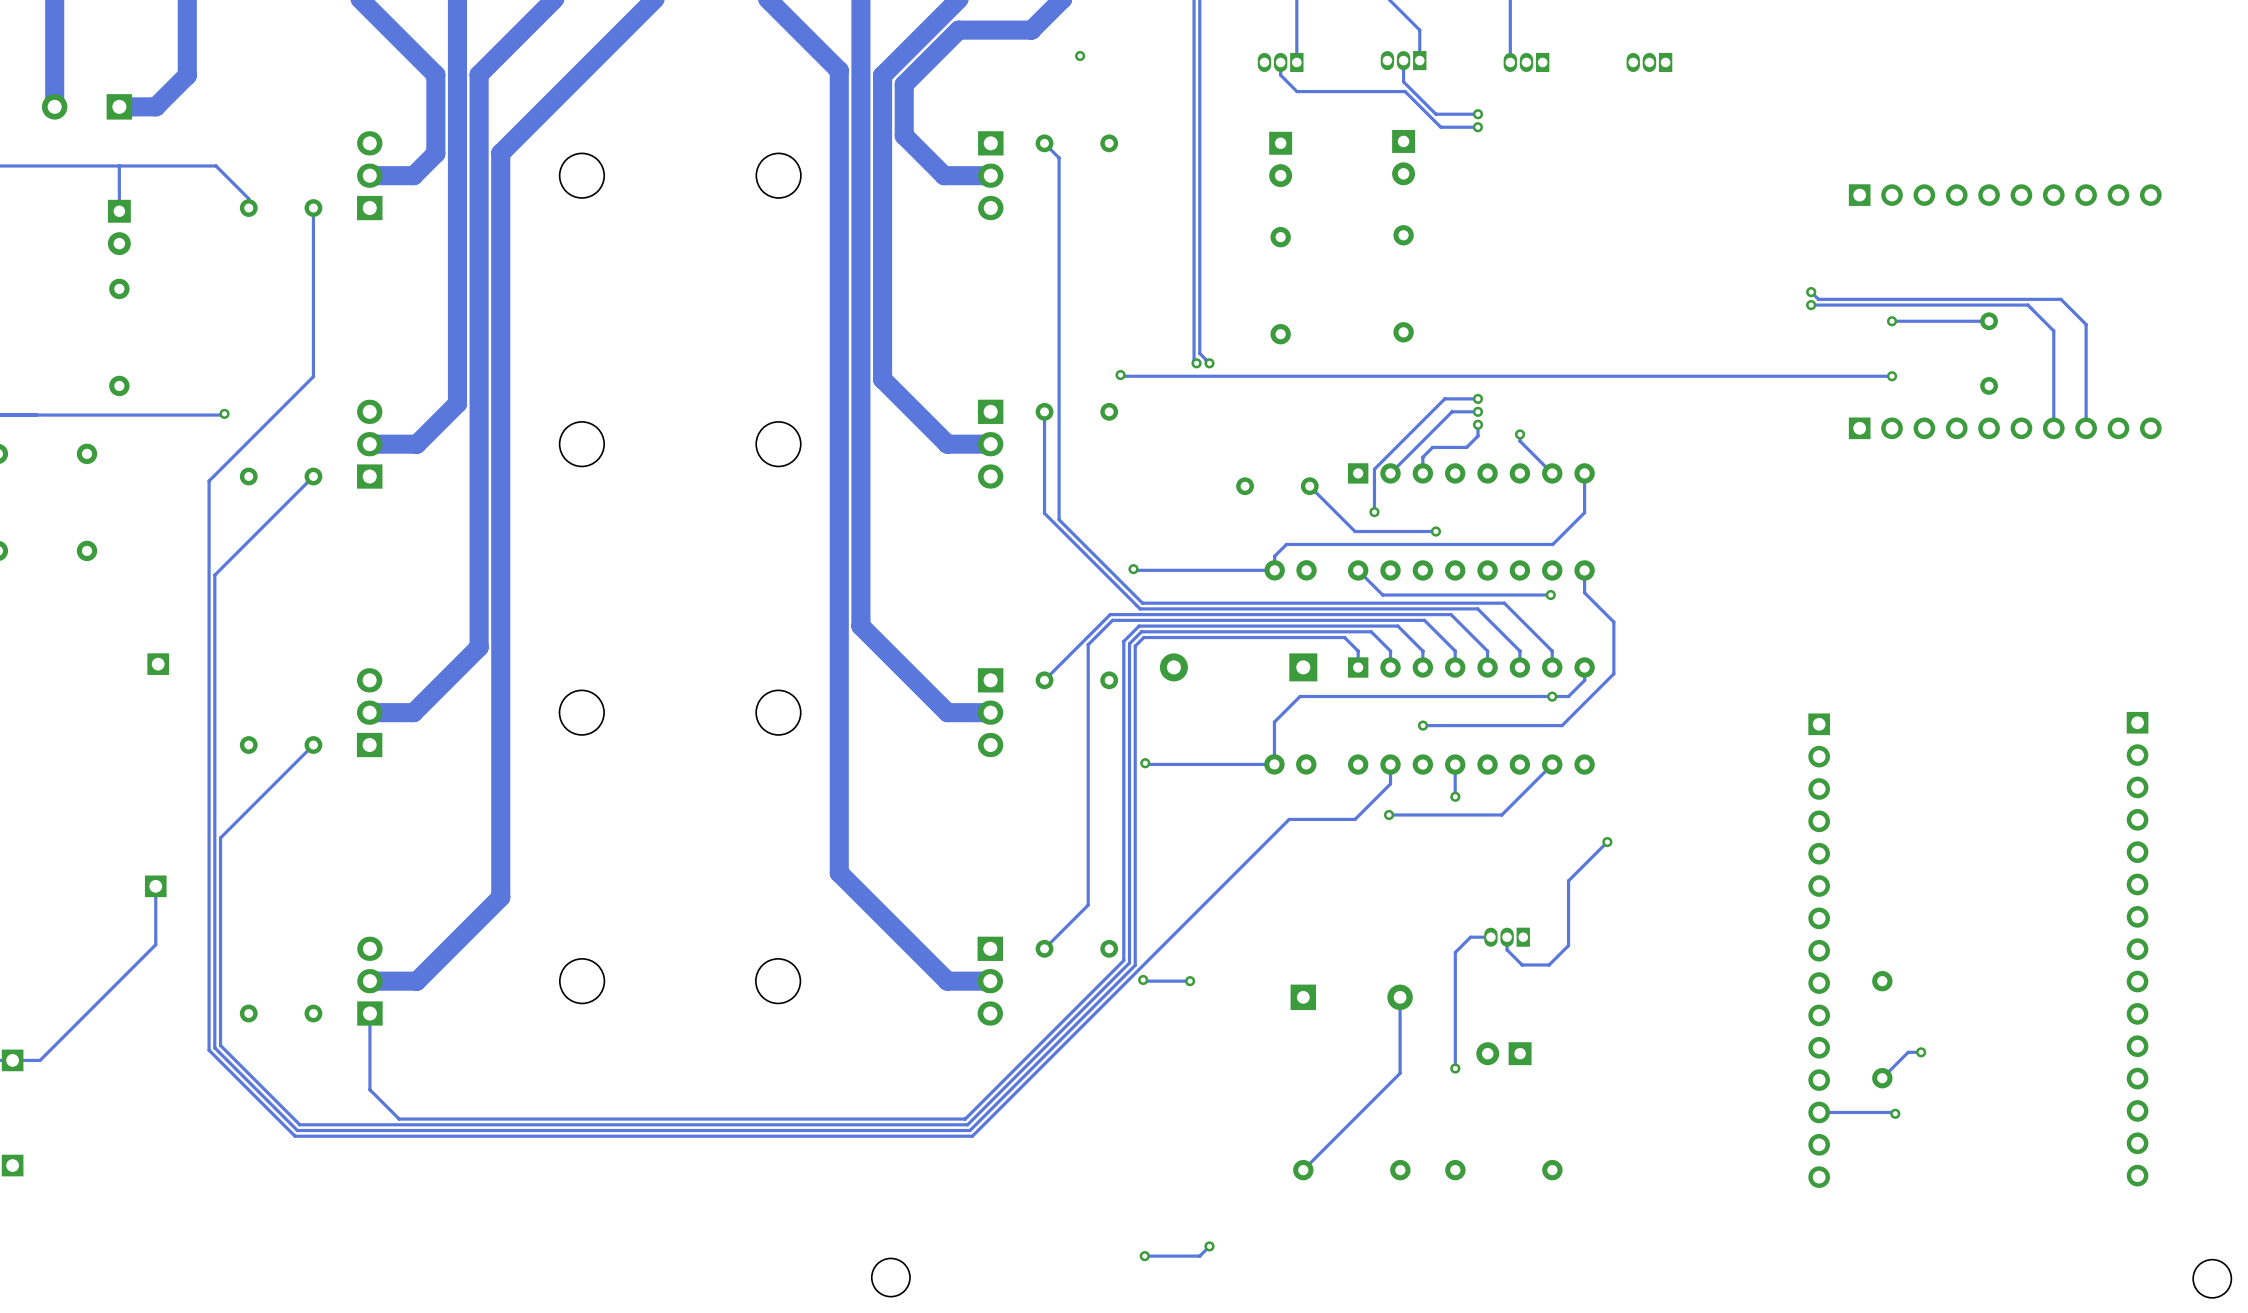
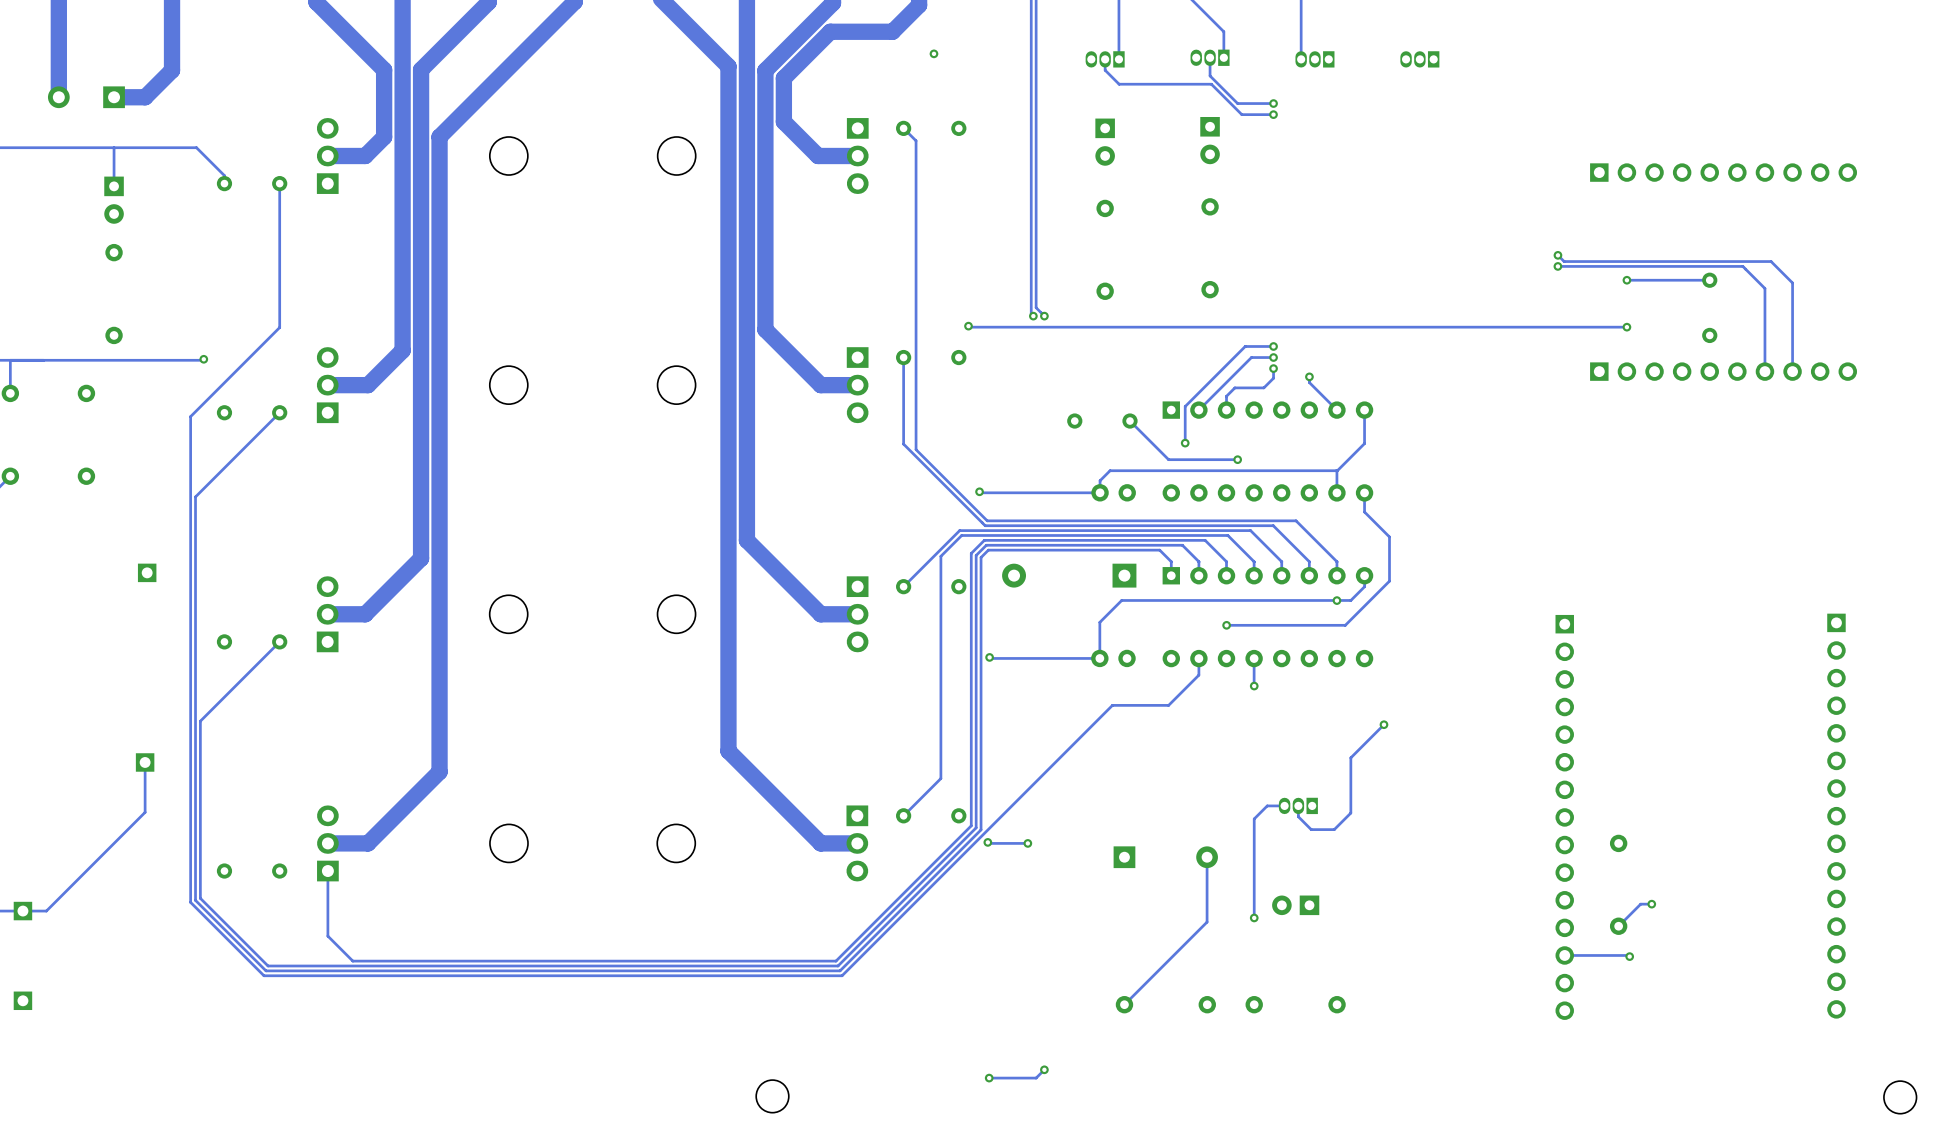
track: none -> (1336, 470) (1336, 492)
track: (1358, 570) (1382, 595) (1550, 595) -> none
via: (1550, 595) -> none
track: (1552, 764) (1501, 814) (1389, 814) -> none
via: (1389, 814) -> none

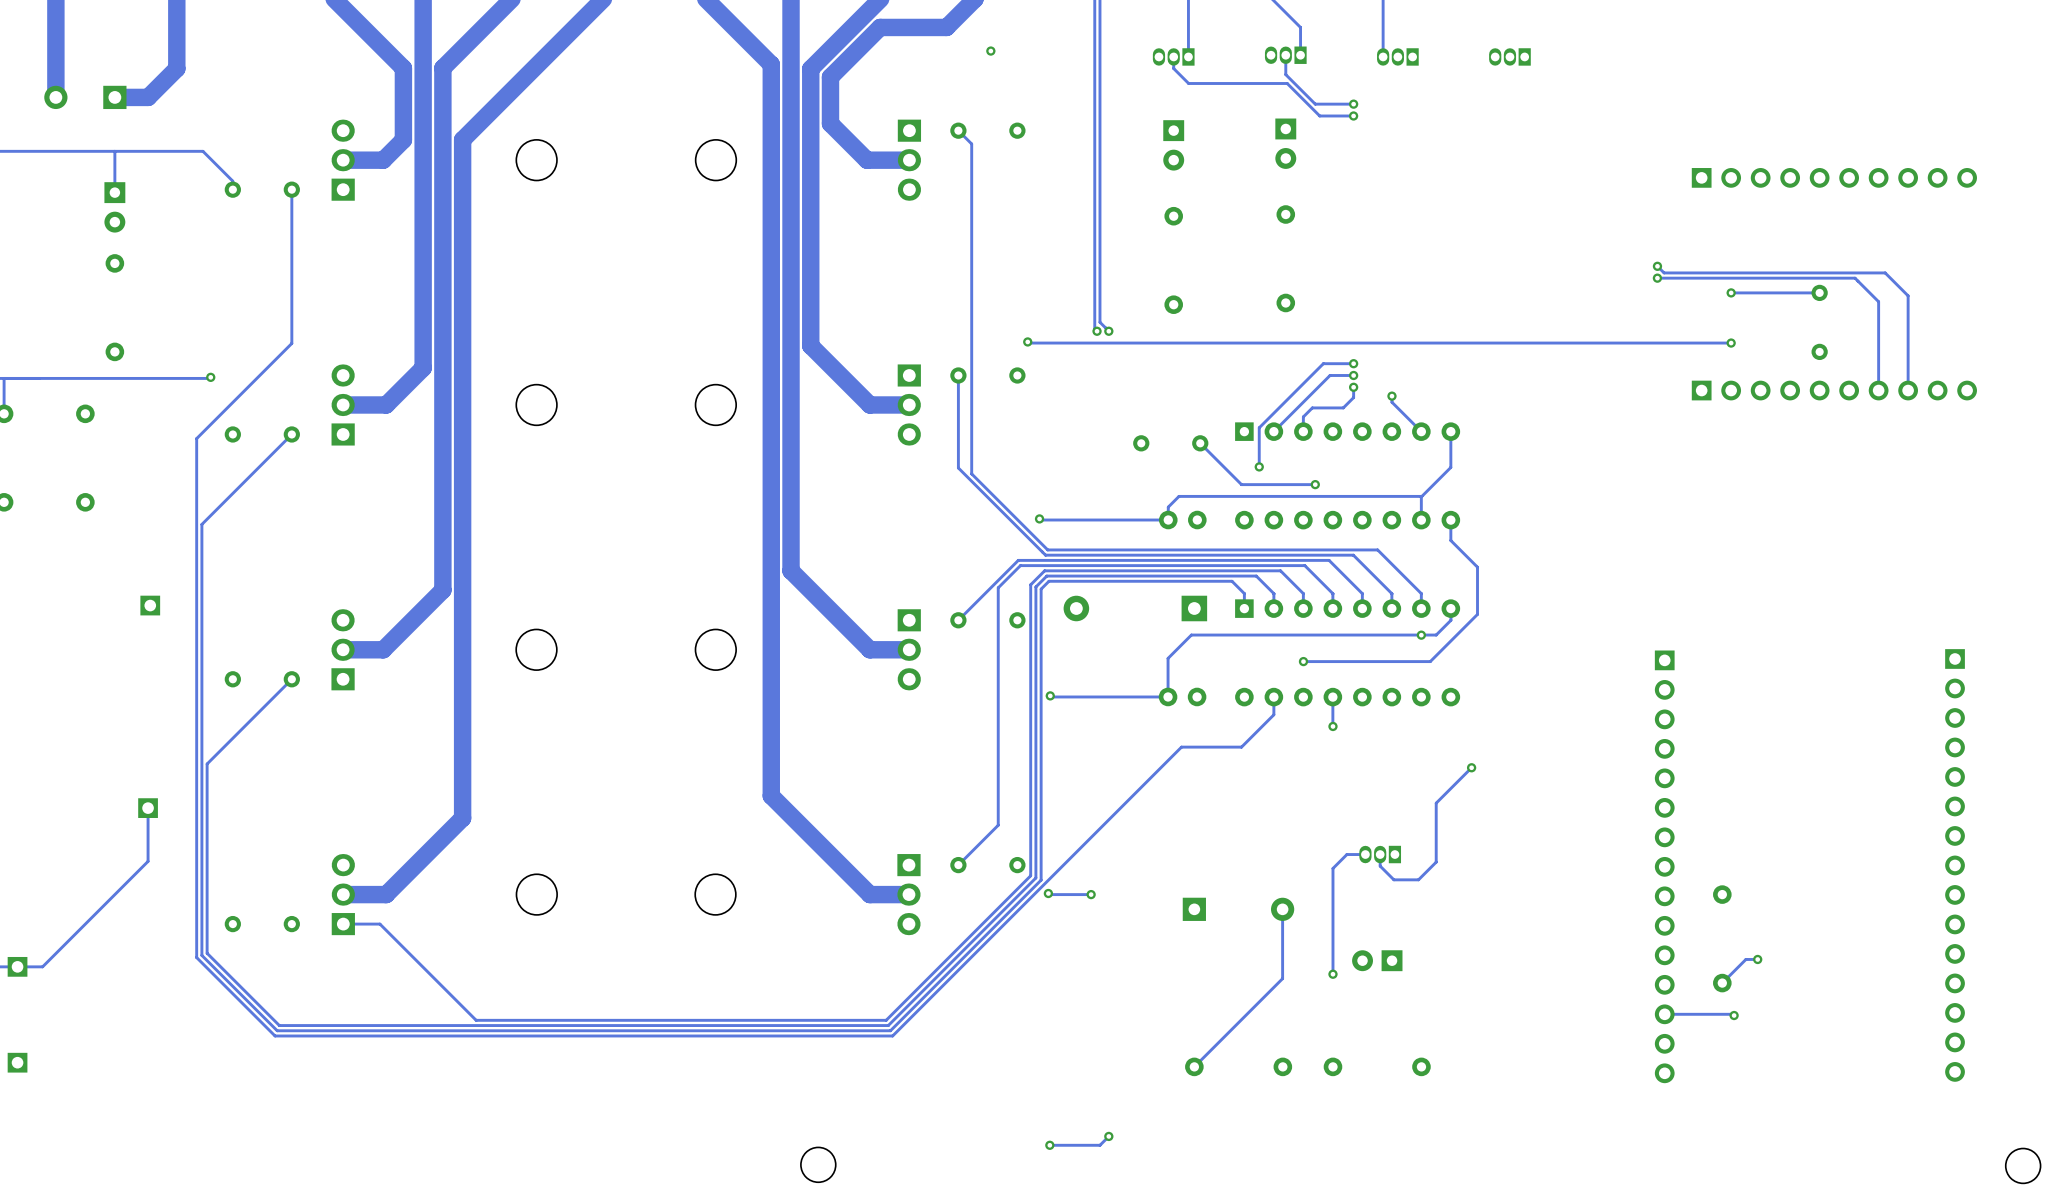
track: (327, 871) (327, 936) (352, 961) (452, 961) -> (343, 924) (379, 924) (476, 1020)

